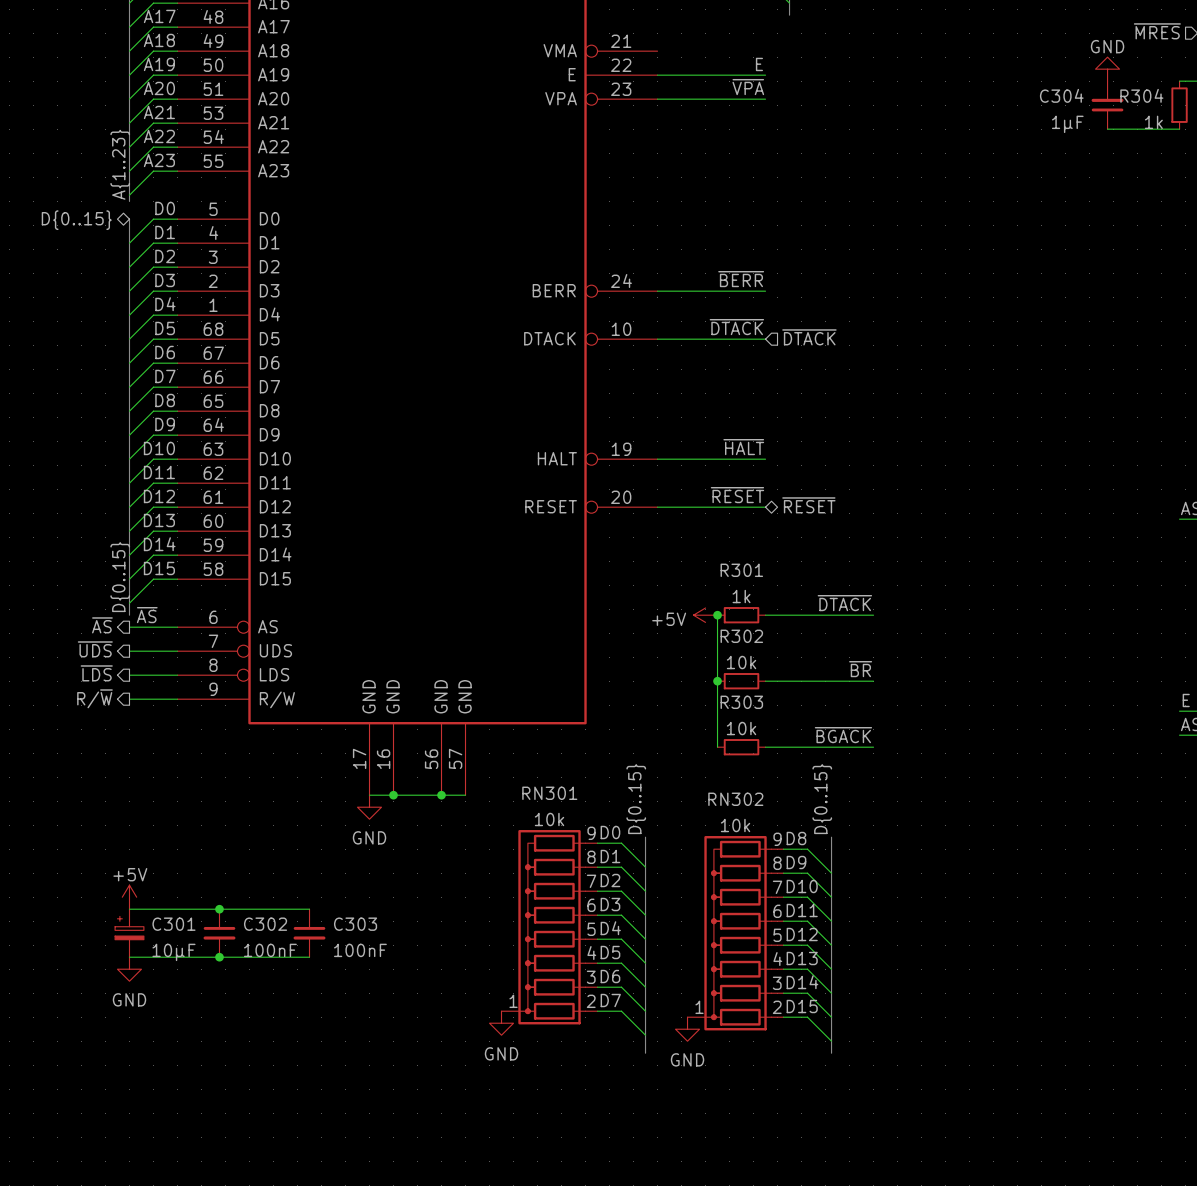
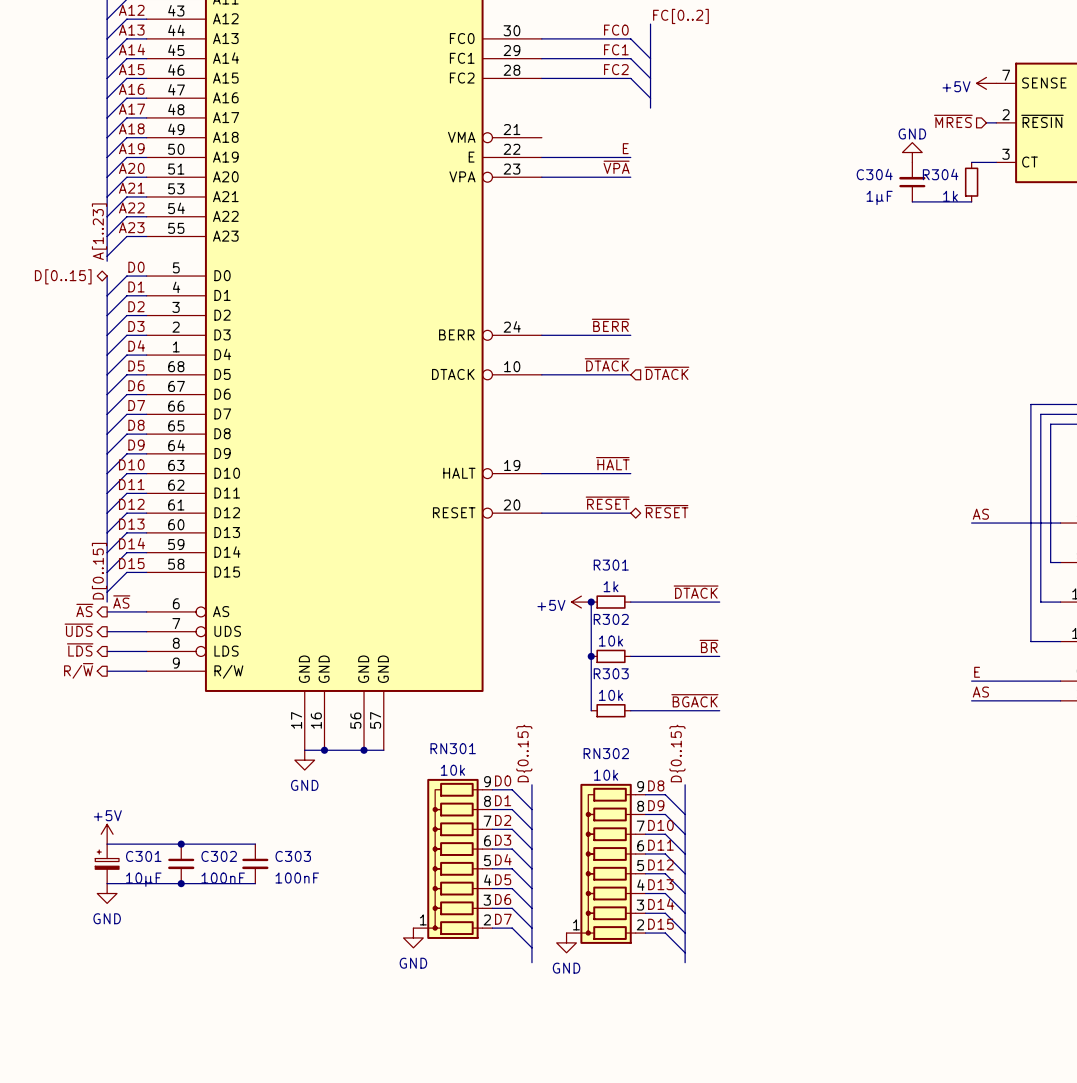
label: A{1..23} (120, 164) -> A[1..23] (99, 231)
hierarchical label: D{0..15} (76, 220) -> D[0..15] (63, 276)
label: D{0..15} (120, 577) -> D[0..15] (99, 571)

